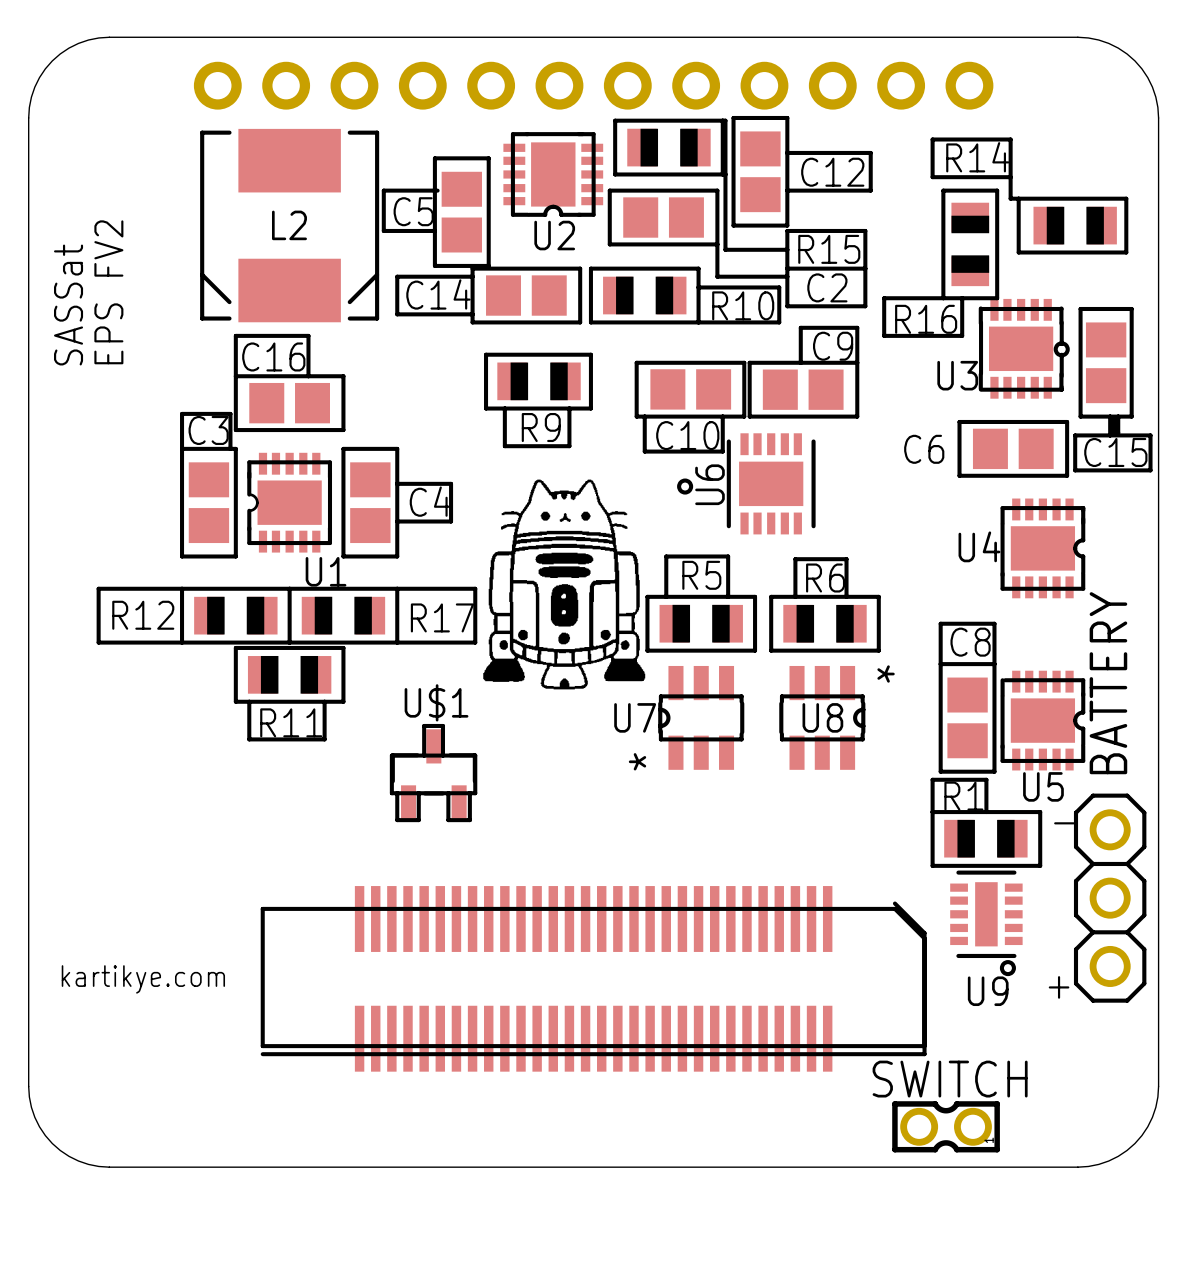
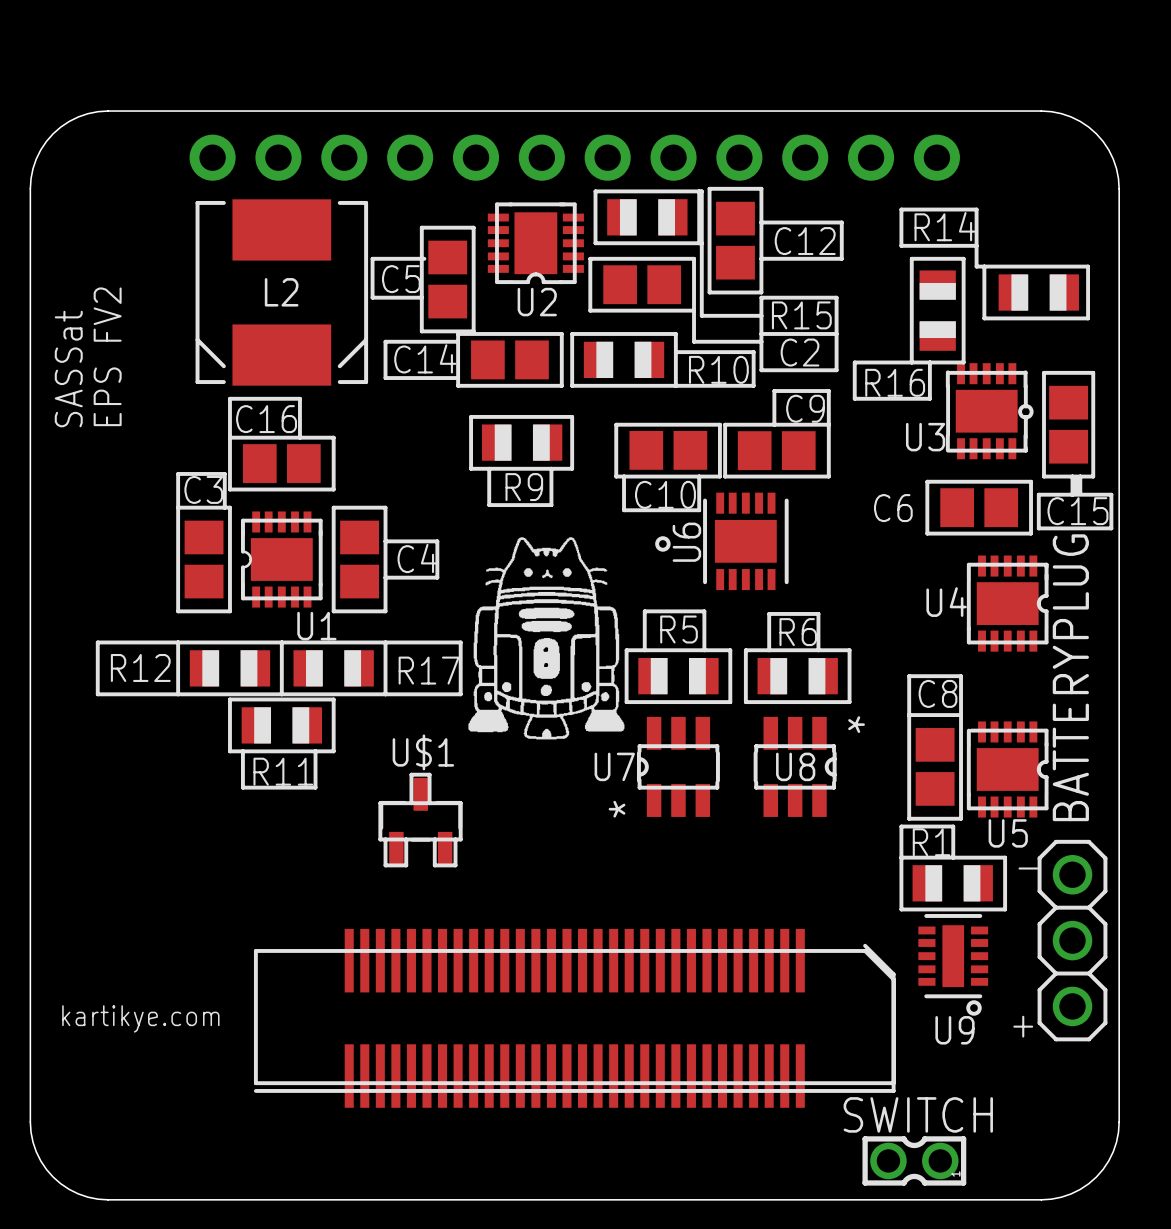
BATTERY name: BATTERY (1108, 683) -> BATTERYPLUG (1070, 677)

